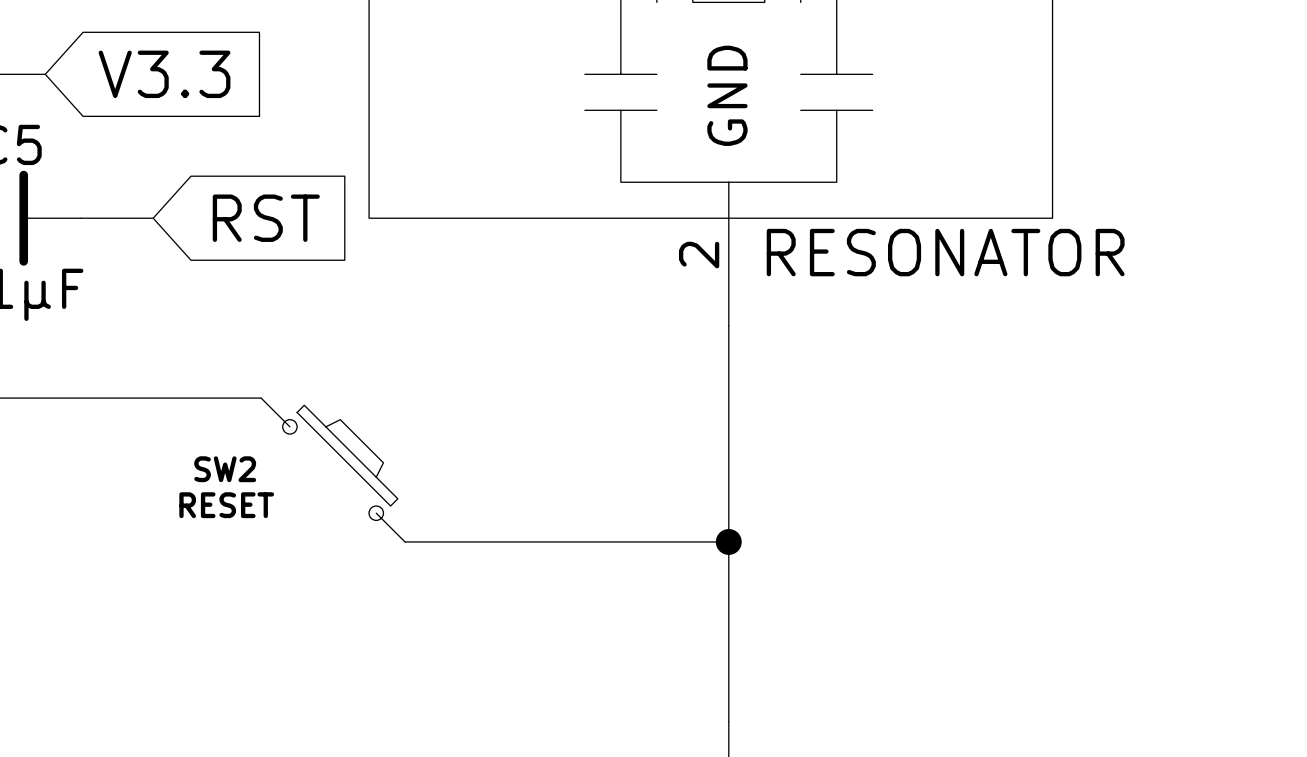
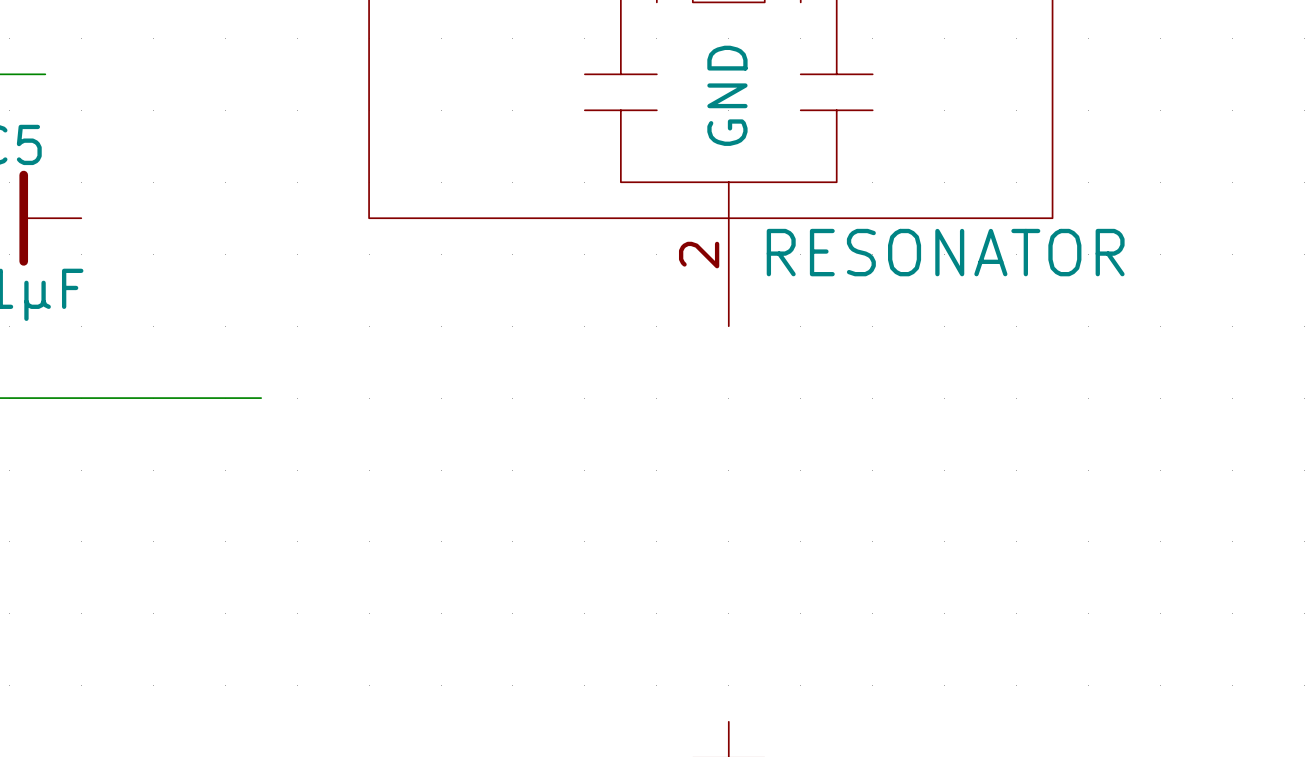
global label: V3.3 (164, 74) -> none
wire: (81, 218) (153, 218) -> none
global label: RST (266, 218) -> none
wire: (728, 326) (728, 721) -> none
SW2: RESET (333, 470) -> none
wire: (405, 541) (728, 541) -> none
junction: (728, 541) -> none

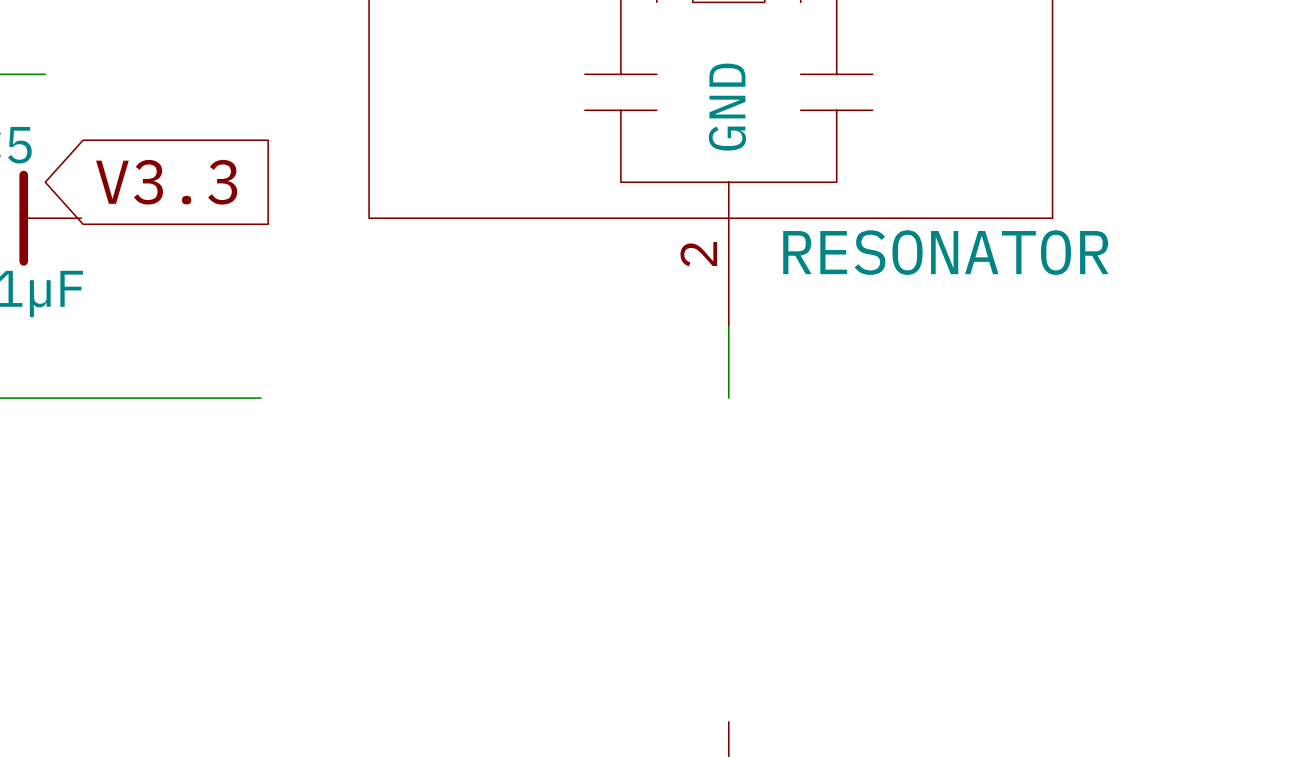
global label: none -> V3.3 (166, 182)
wire: none -> (728, 326) (728, 398)

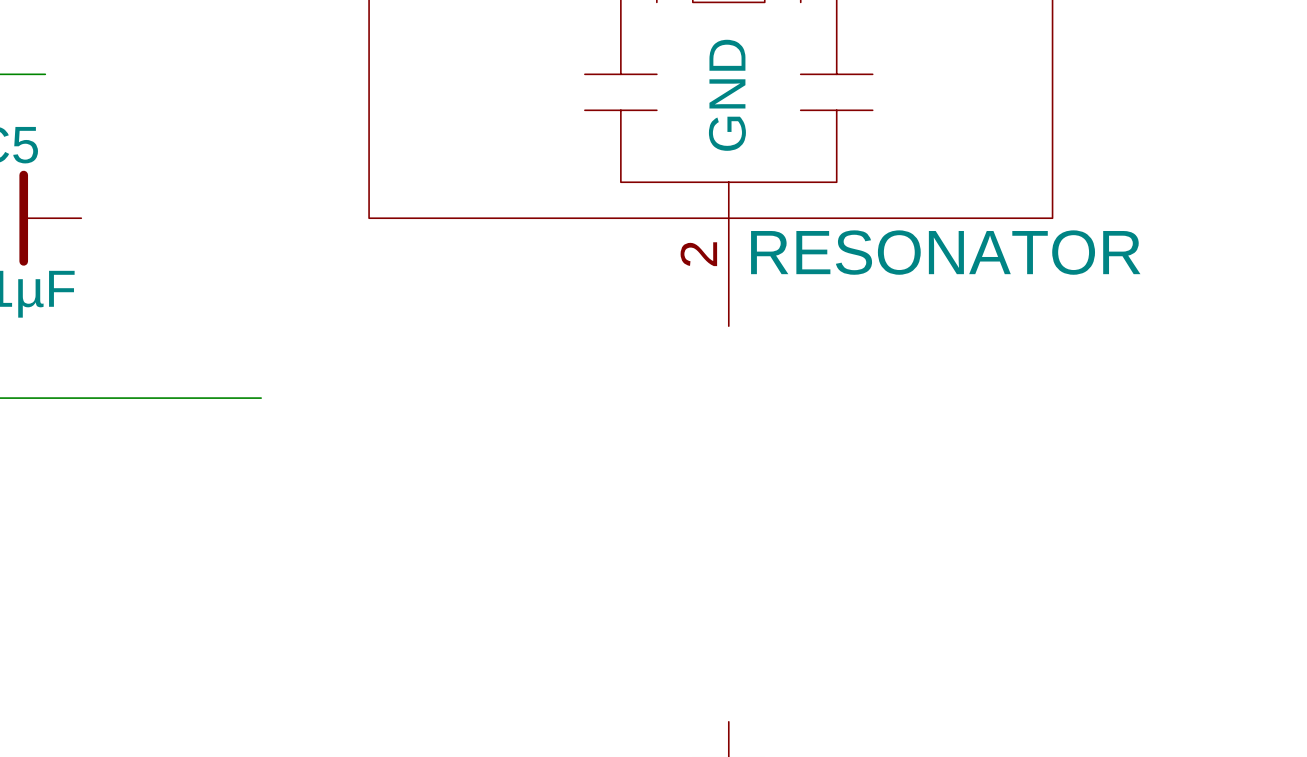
global label: V3.3 (166, 182) -> none
wire: (728, 326) (728, 398) -> none

